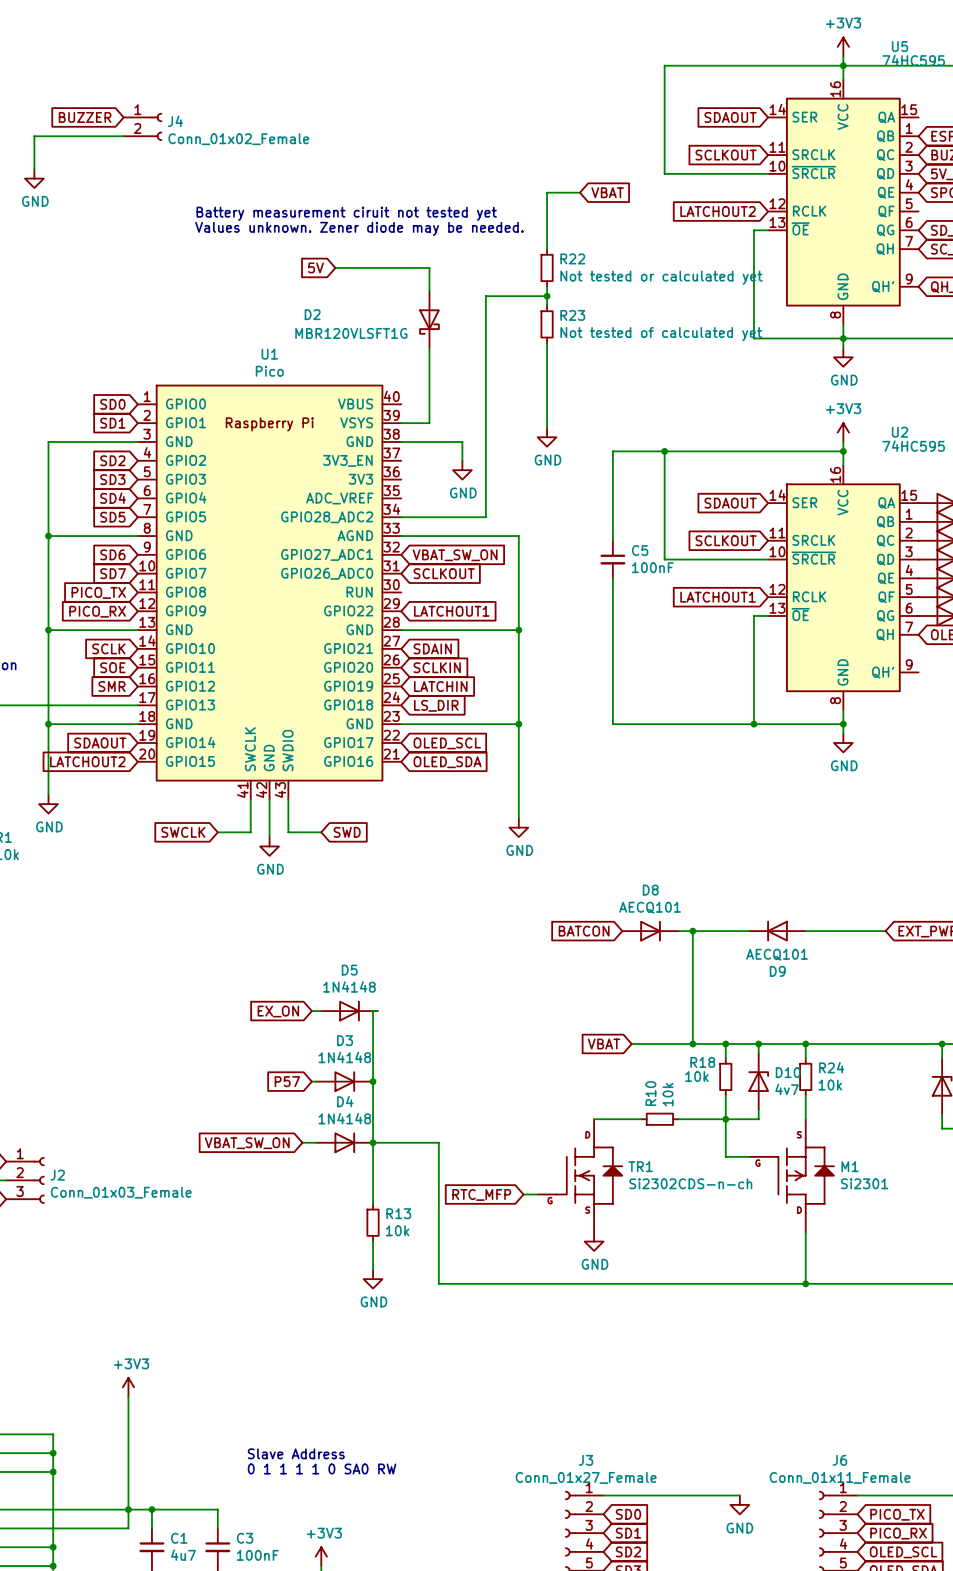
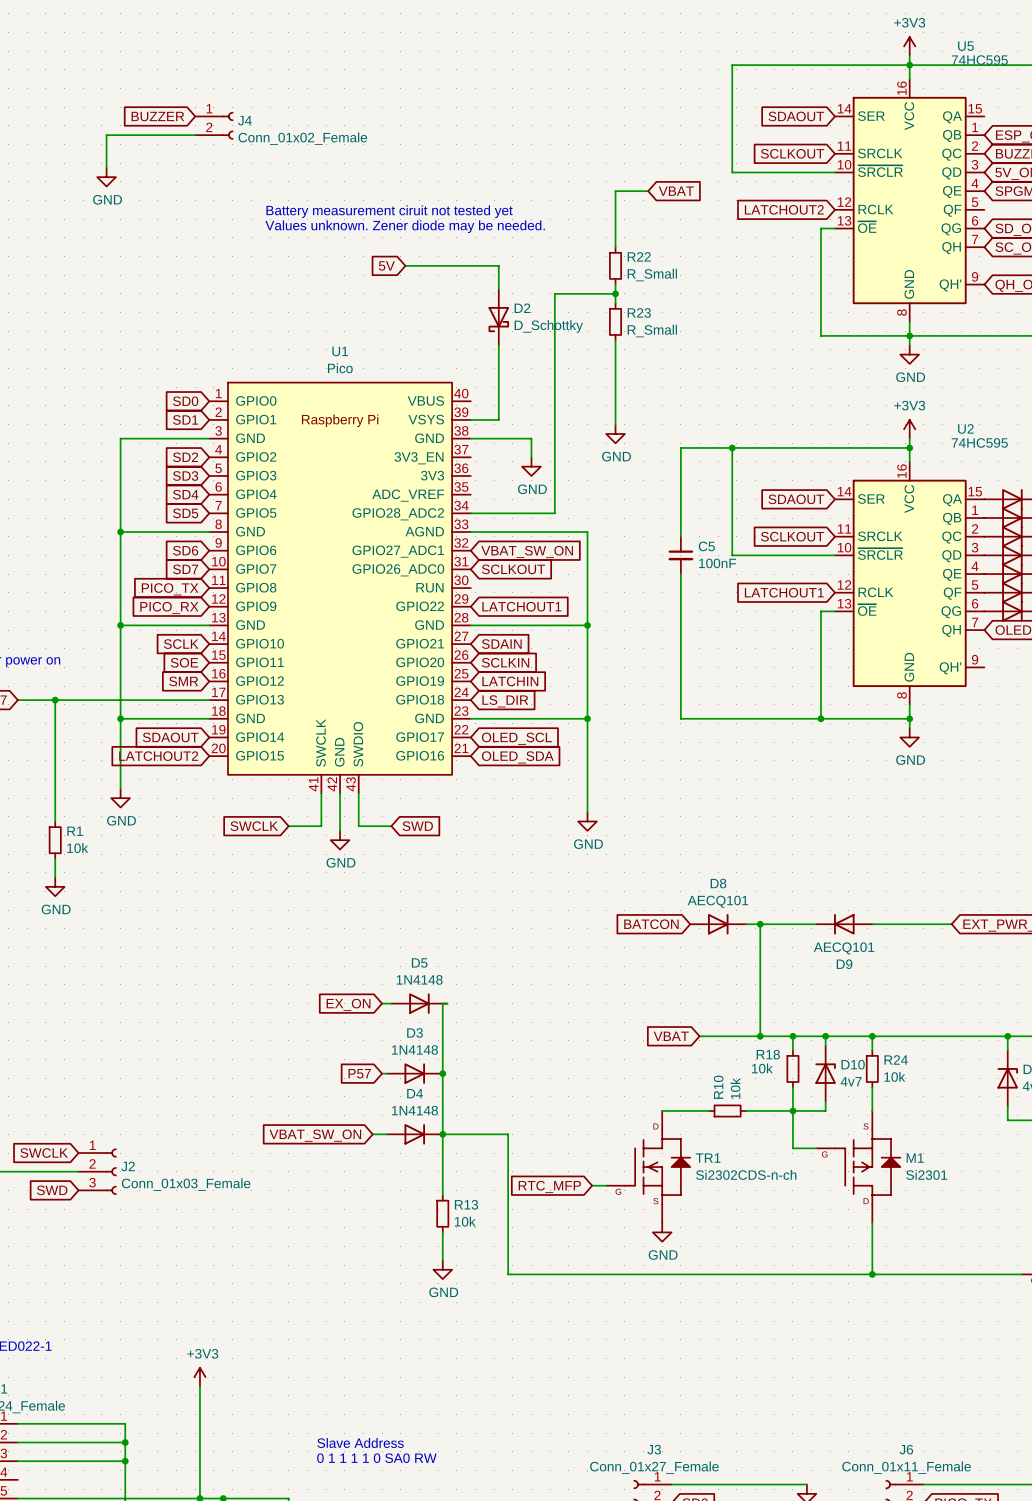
R22 value: Not tested or calculated yet (661, 277) -> R_Small (652, 275)
D2 name position: D2 (312, 314) -> D2 (522, 308)
D2 value: MBR120VLSFT1G (351, 333) -> D_Schottky (548, 326)
R23 value: Not tested of calculated yet (661, 334) -> R_Small (652, 331)

